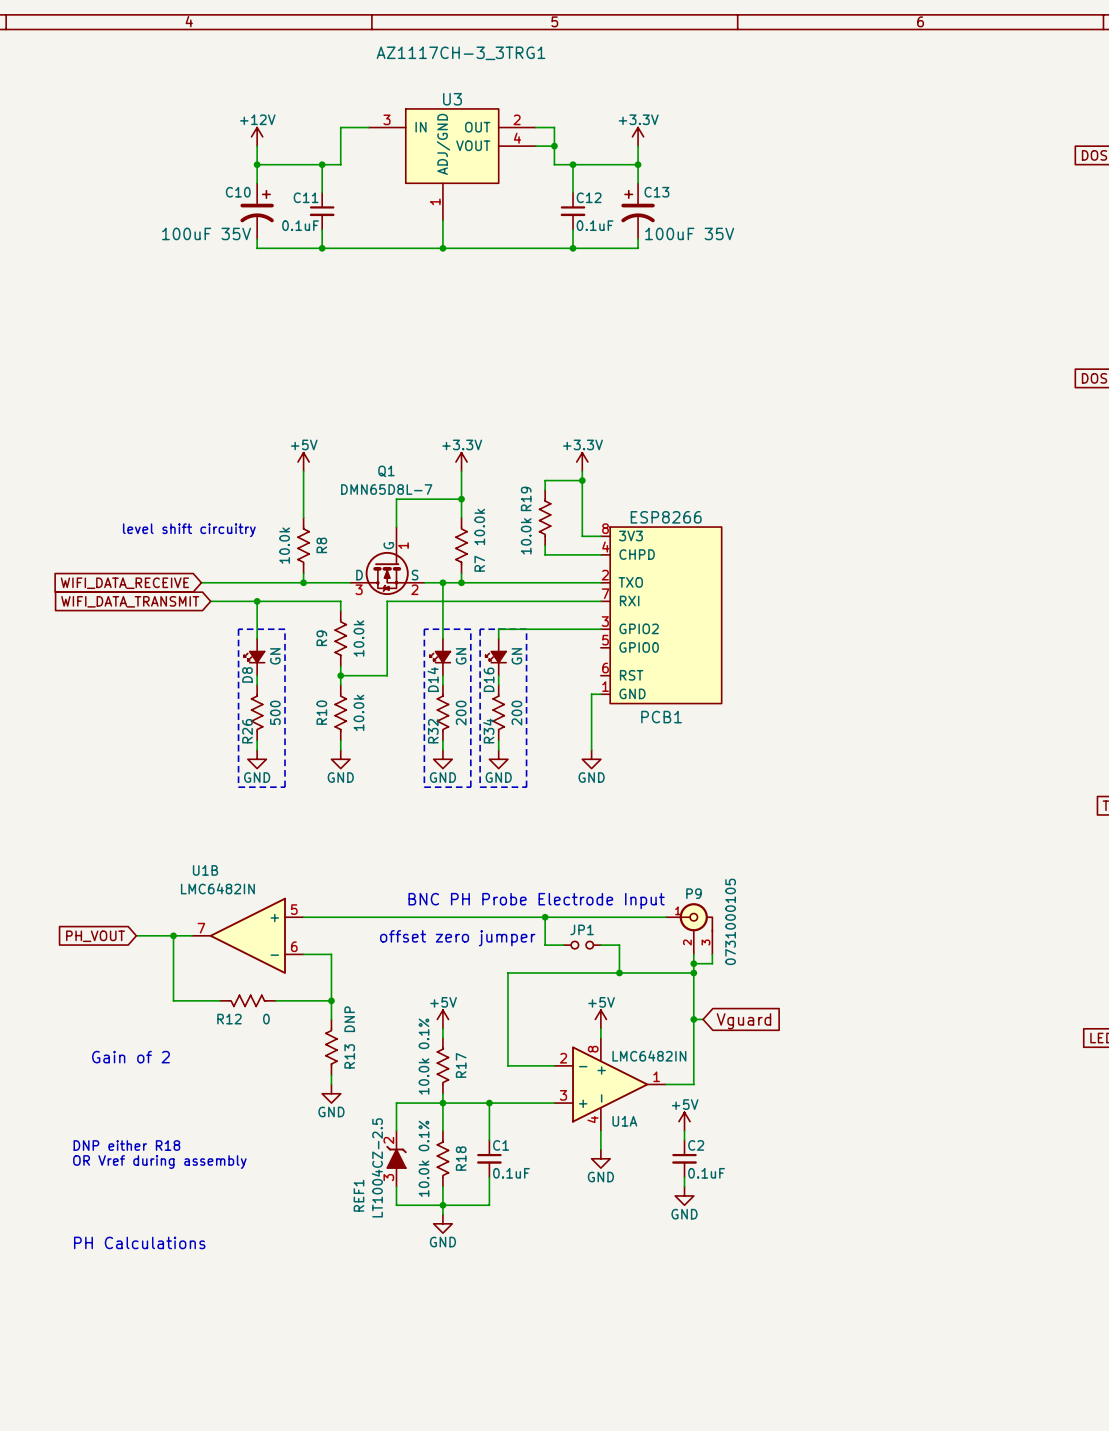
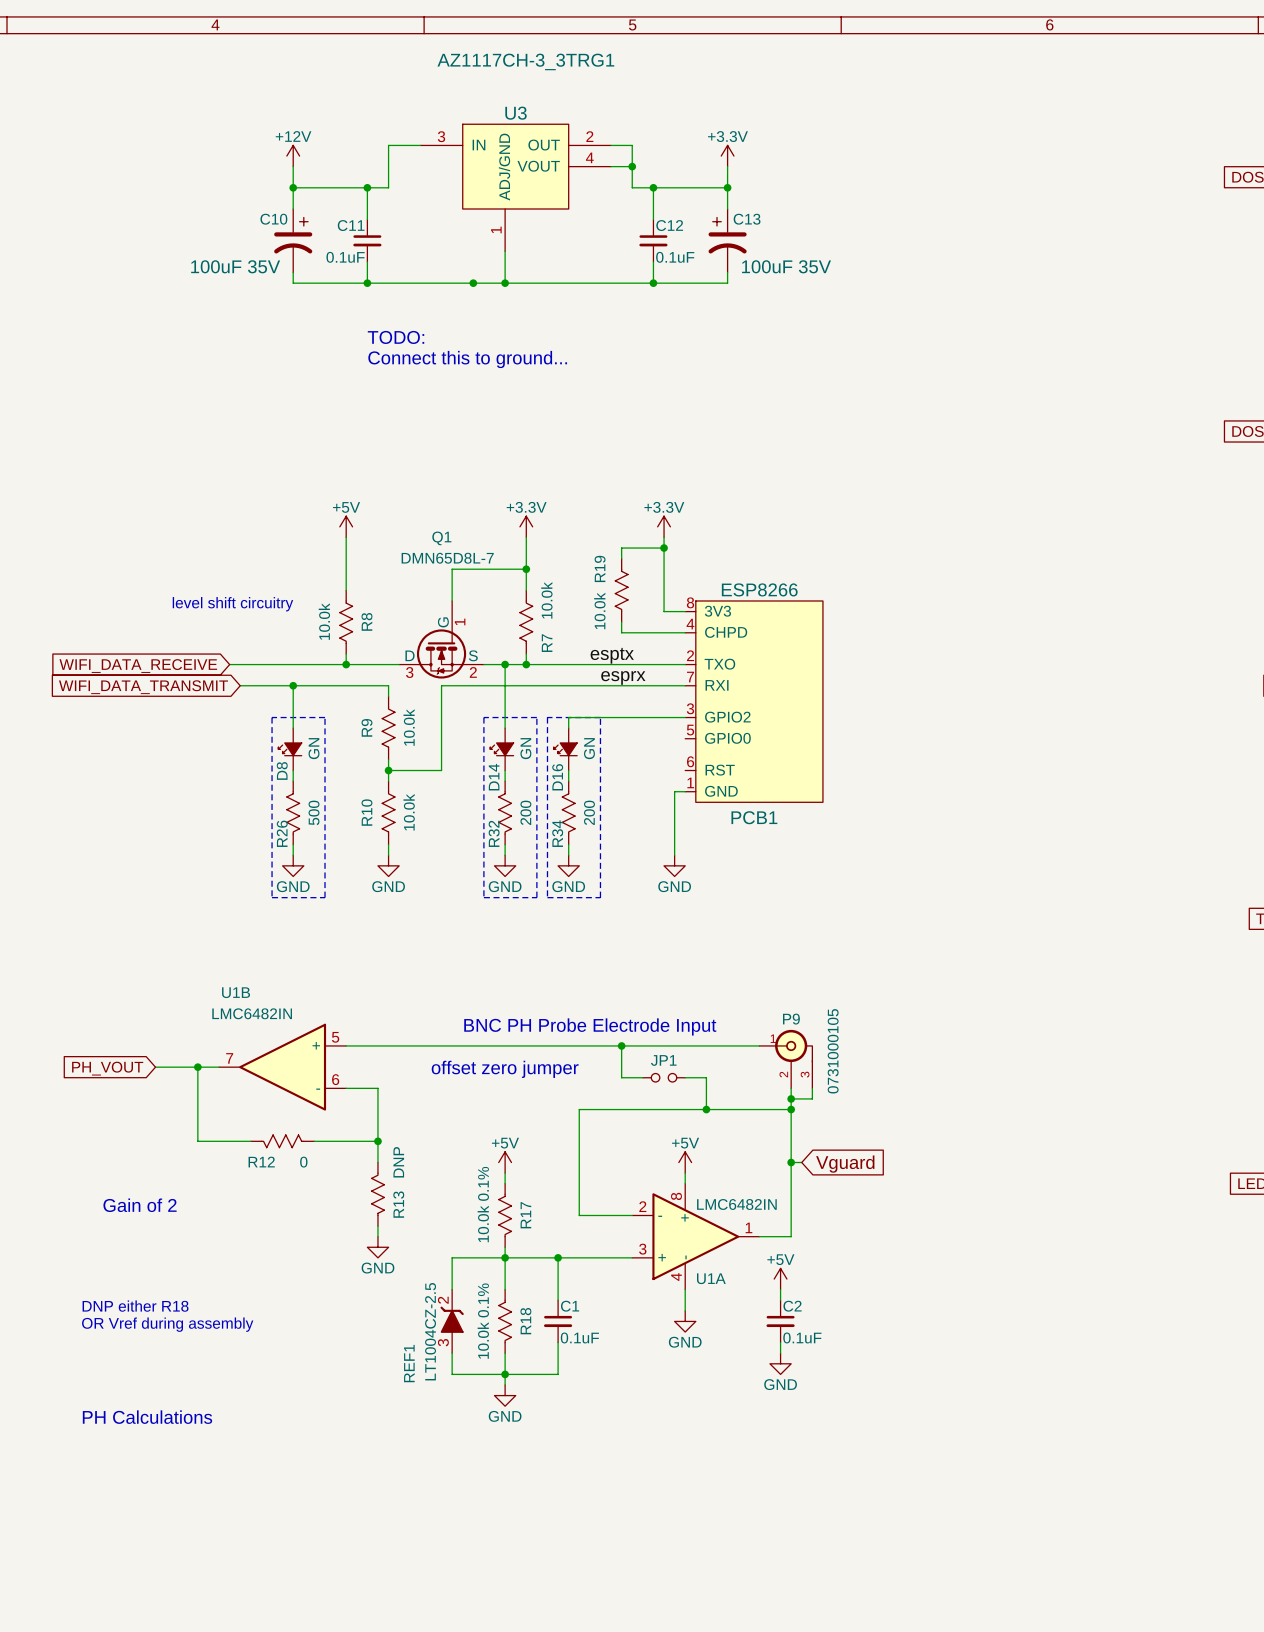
junction: none -> (473, 283)
text: none -> TODO: (396, 337)
text: none -> Connect this to ground... (467, 359)
label: none -> esptx (612, 655)
label: none -> esprx (623, 677)

